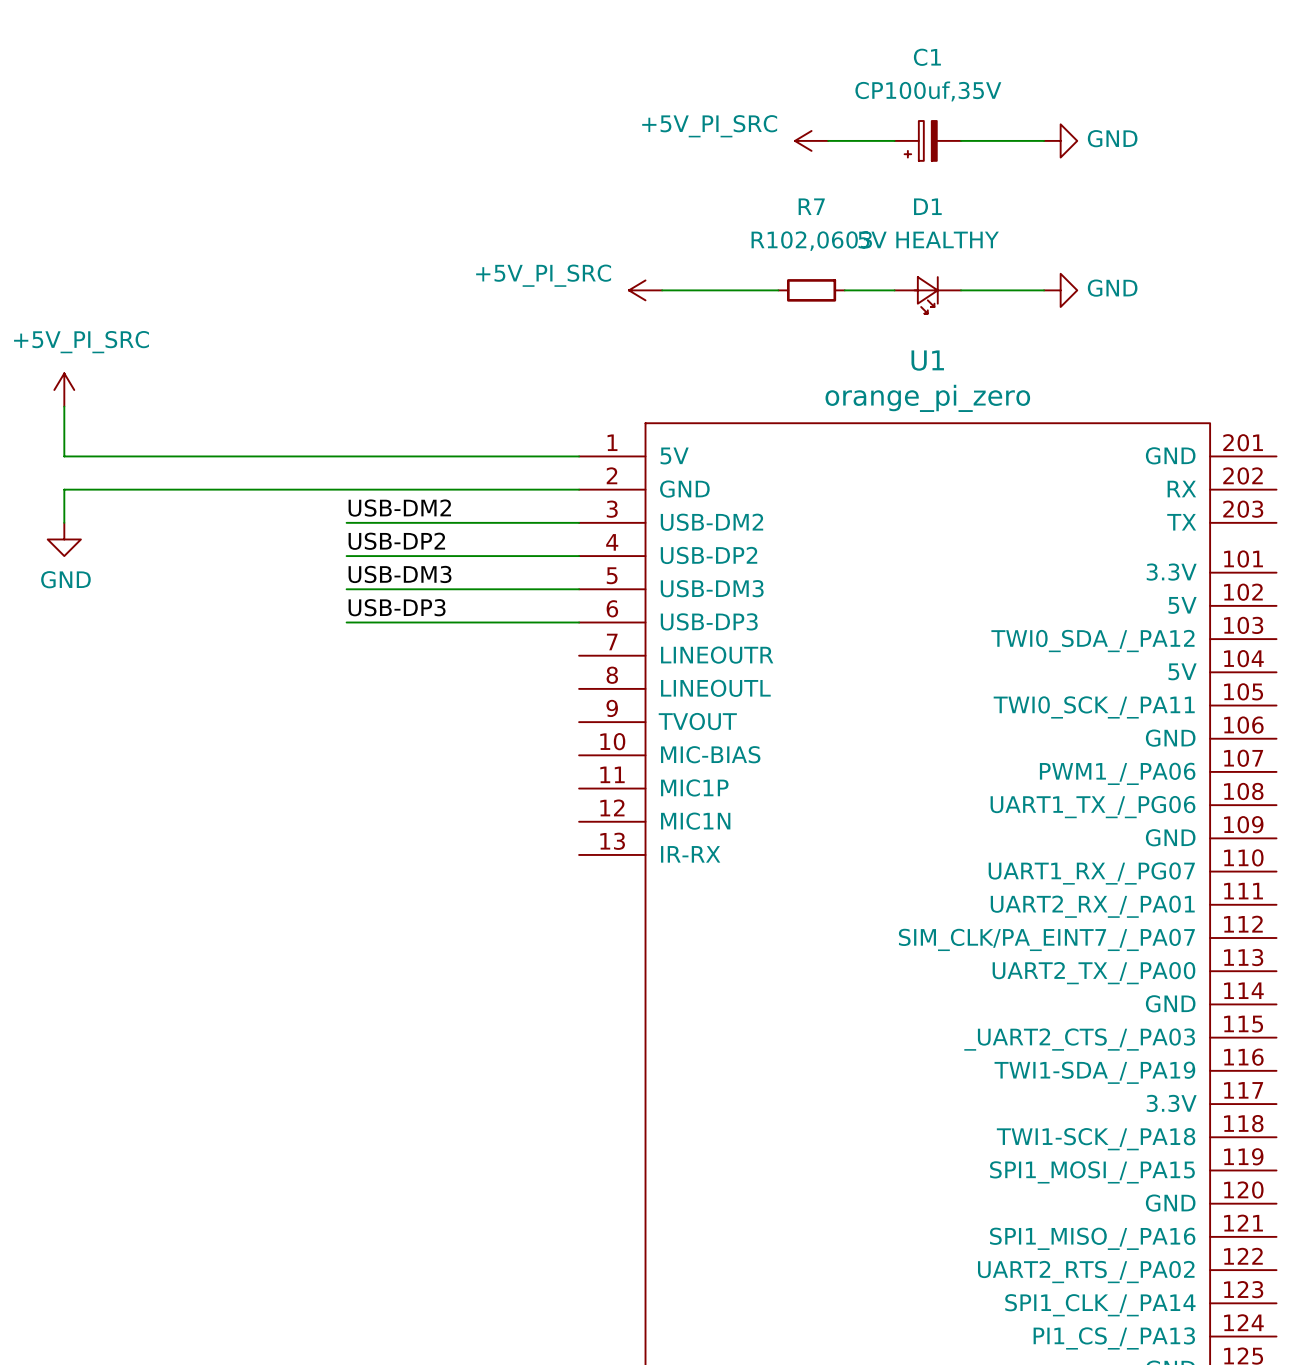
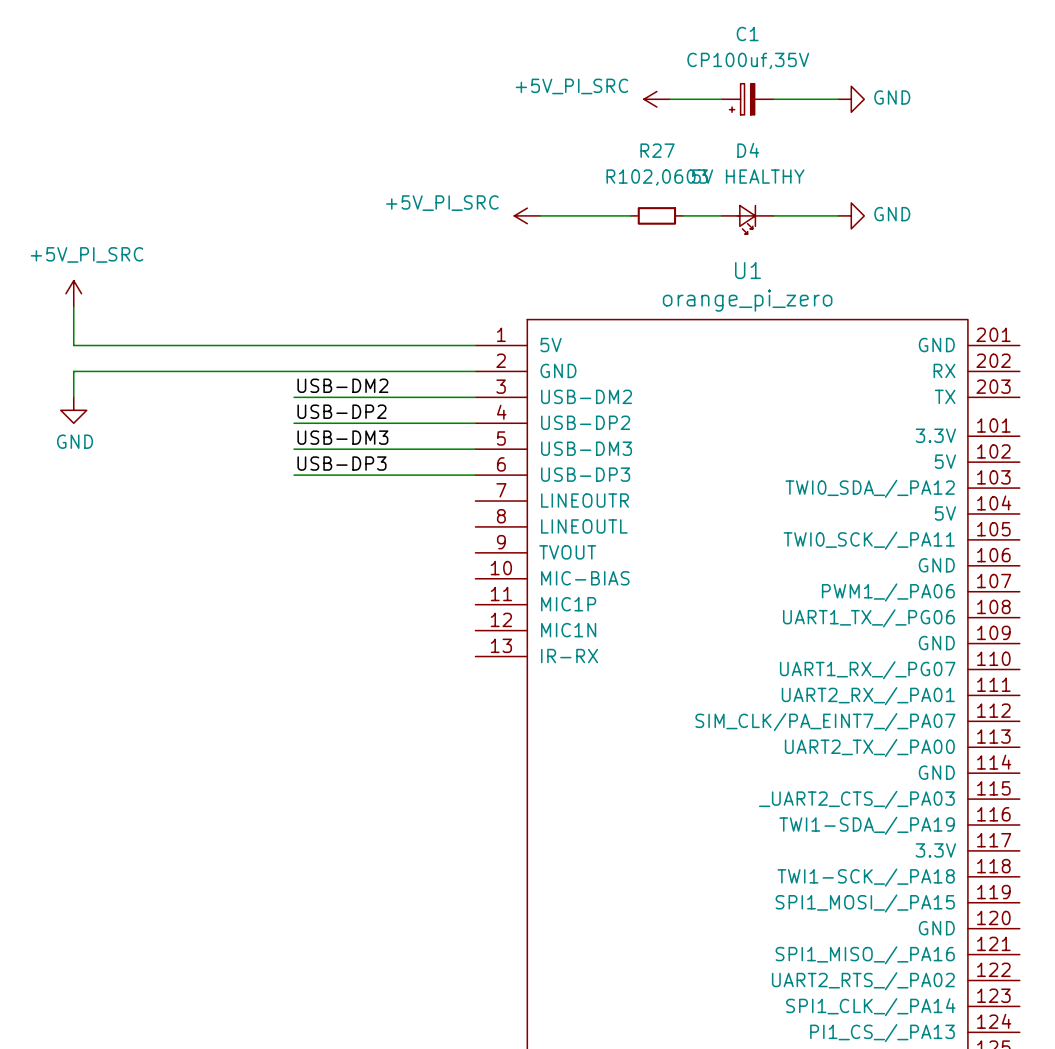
R7 name: R7 (811, 206) -> R27 (657, 150)
D1 name: D1 (927, 206) -> D4 (748, 150)

